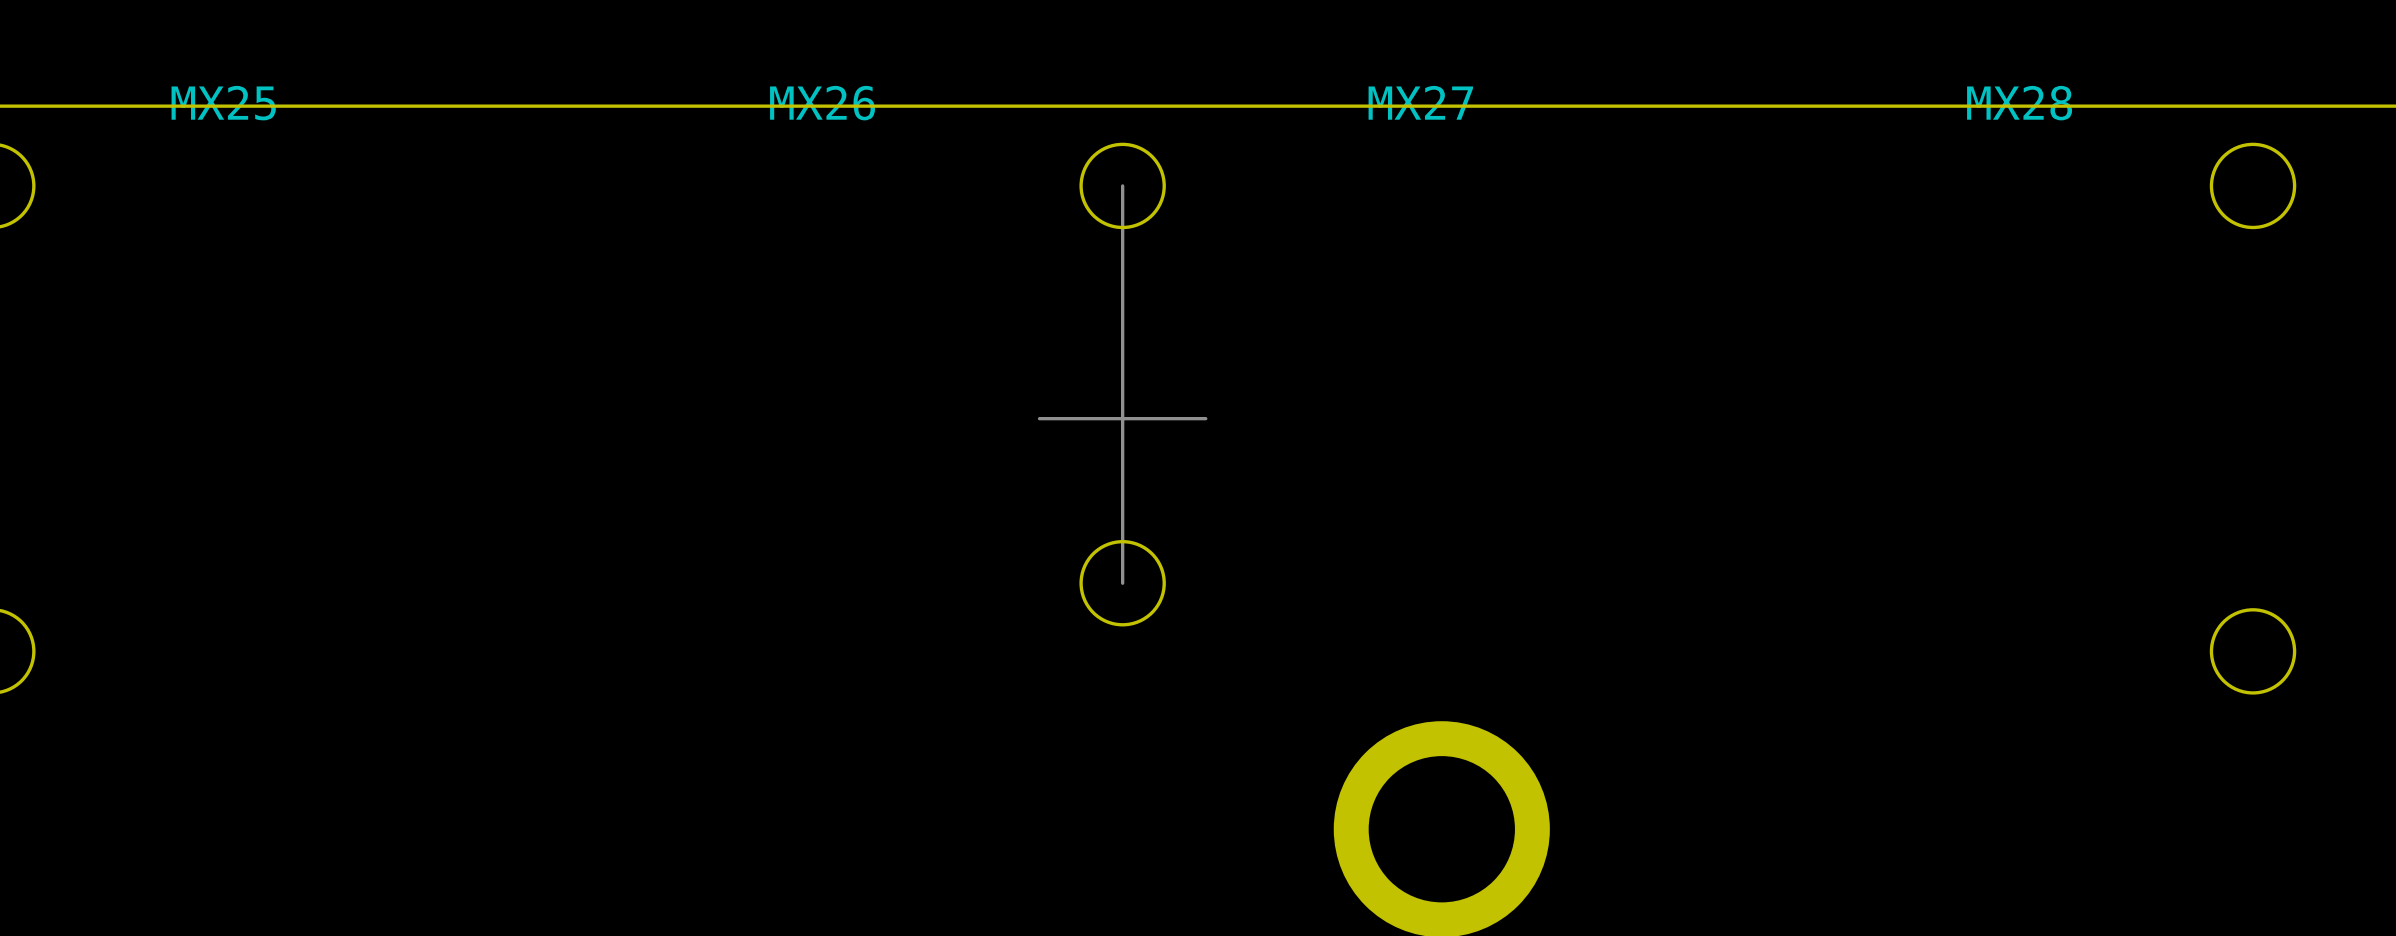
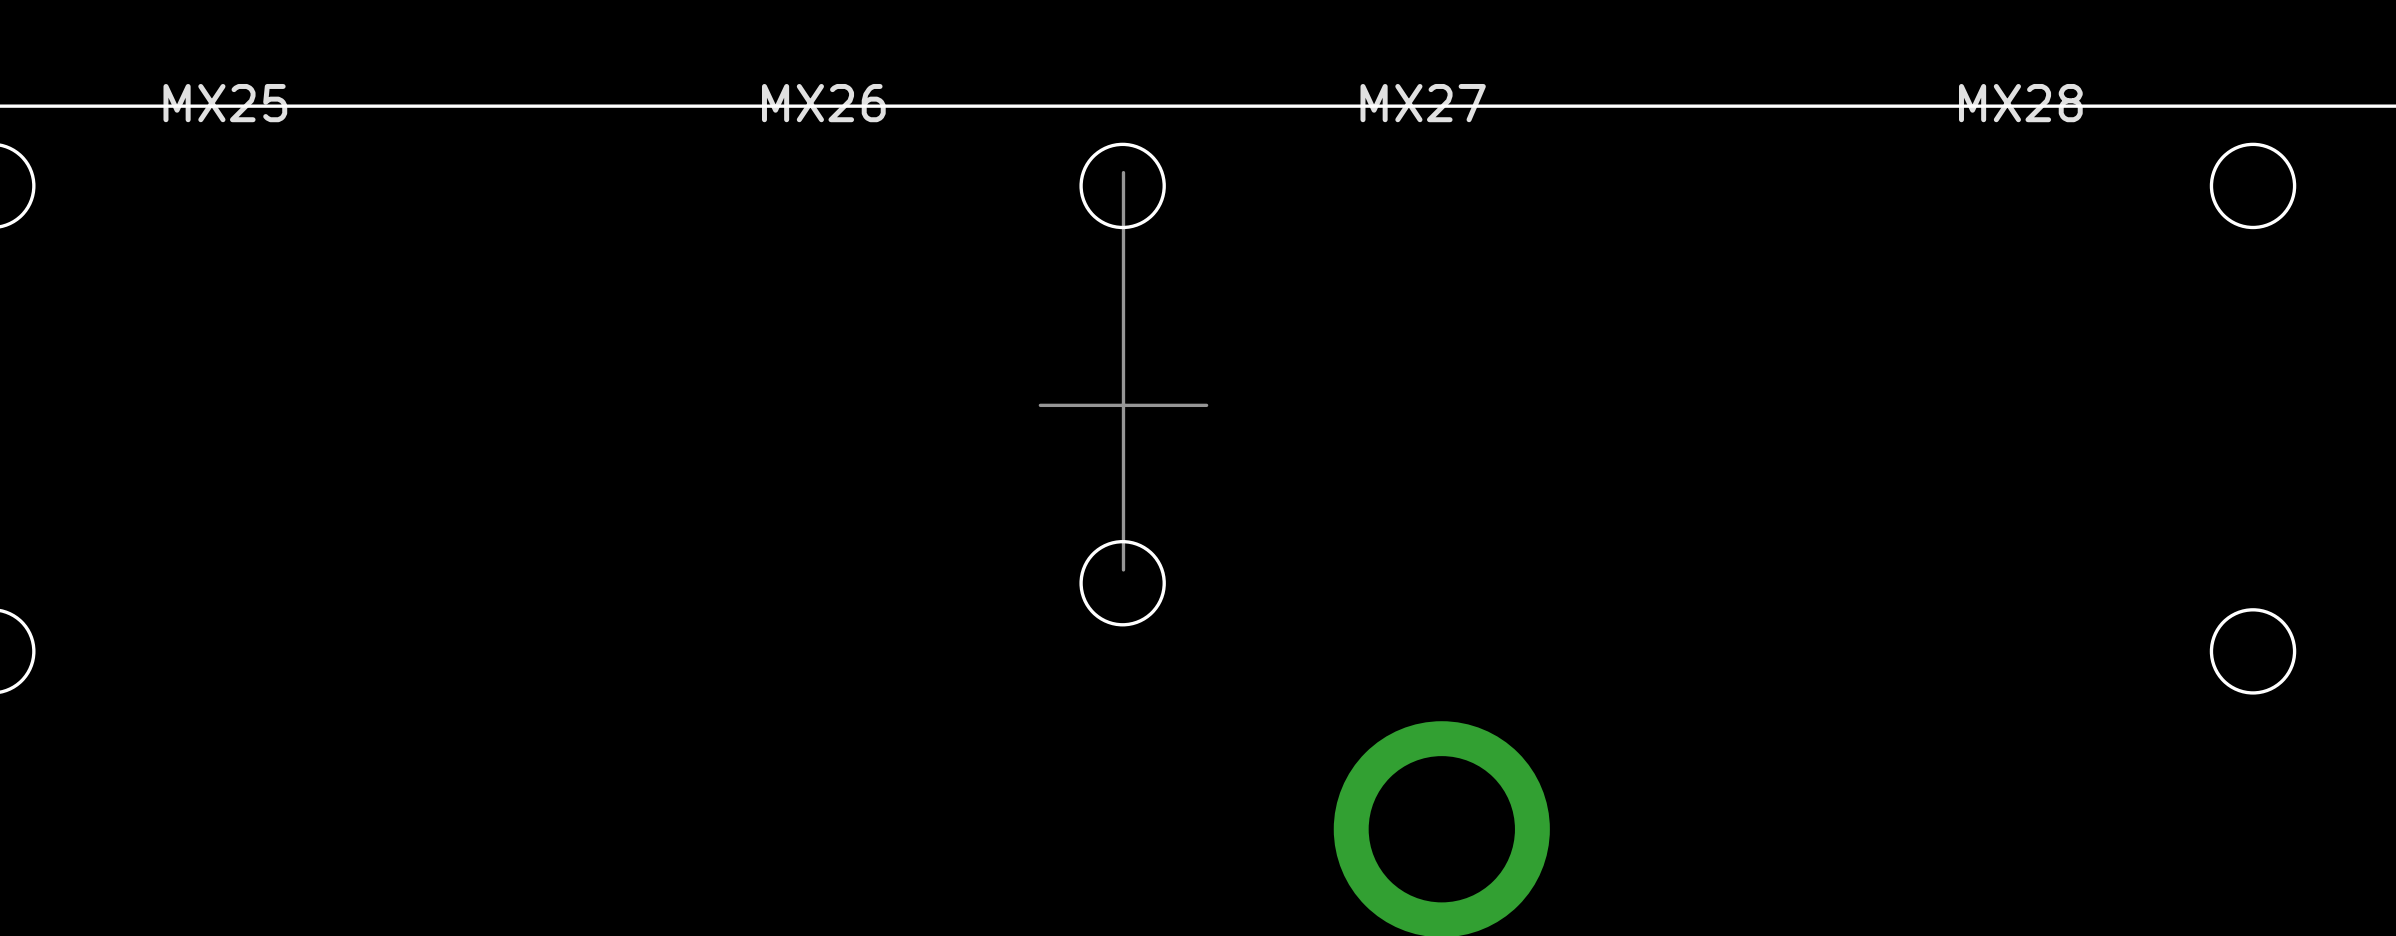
line: (1122, 185) (1122, 583) -> (1123, 172) (1123, 569)
line: (1039, 418) (1205, 418) -> (1040, 405) (1206, 405)

